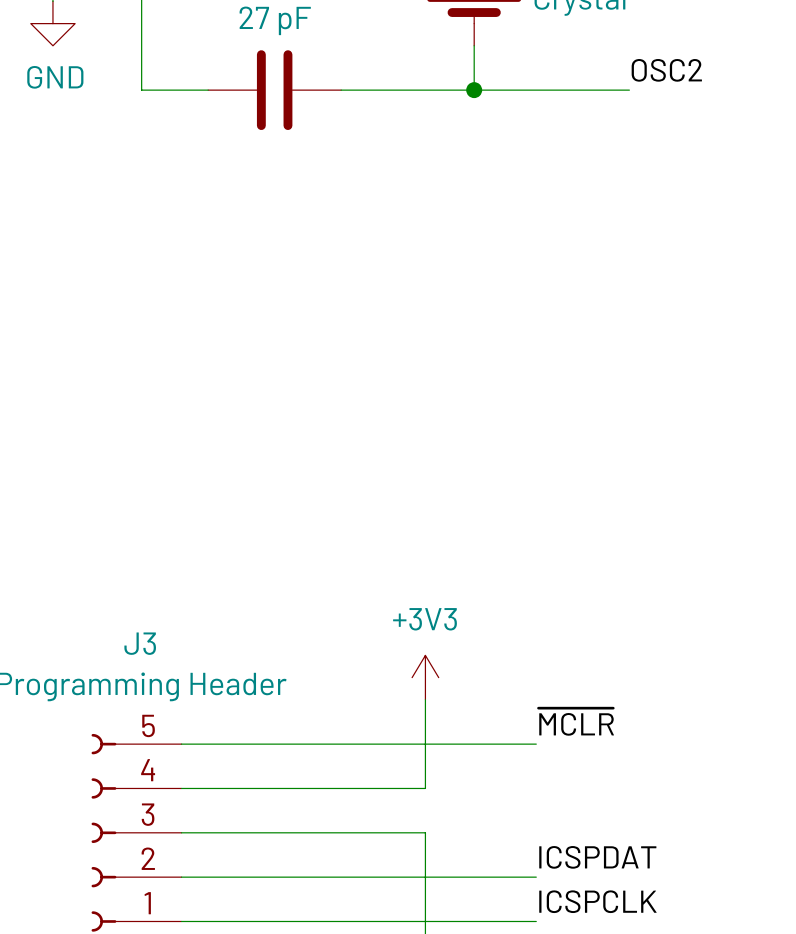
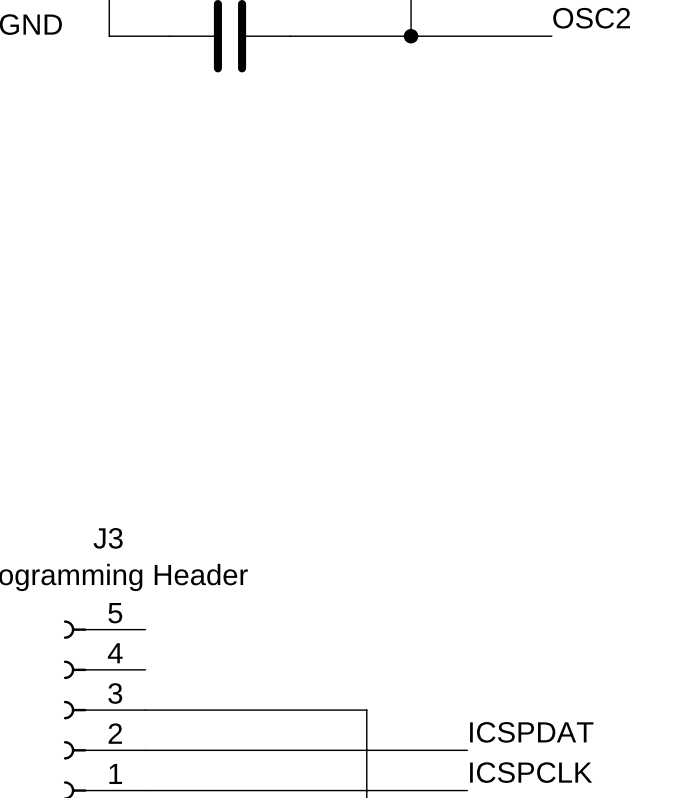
power symbol: +3V3 (425, 677) -> none
wire: (425, 699) (425, 788) (181, 788) -> none
label: ~{MCLR} (576, 721) -> none
wire: (181, 744) (536, 744) -> none

